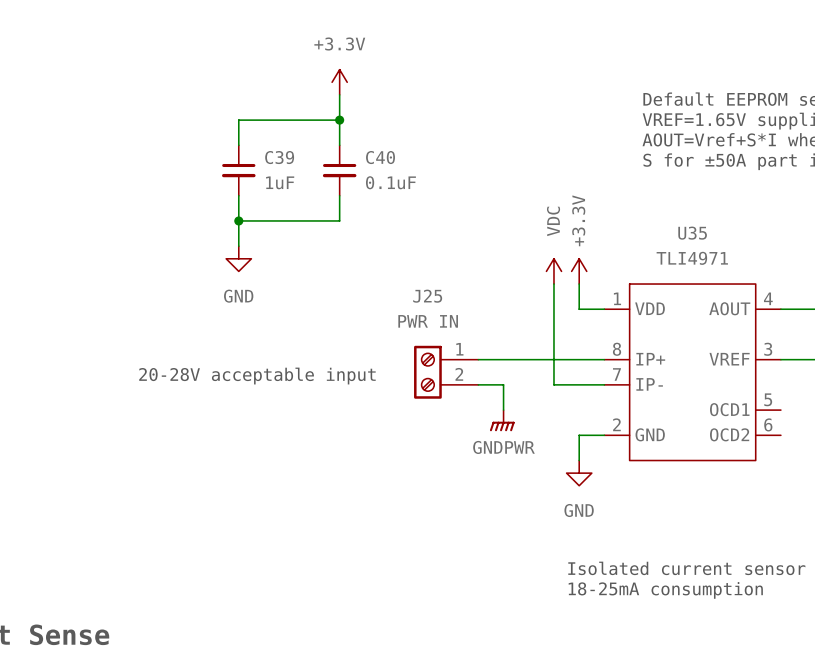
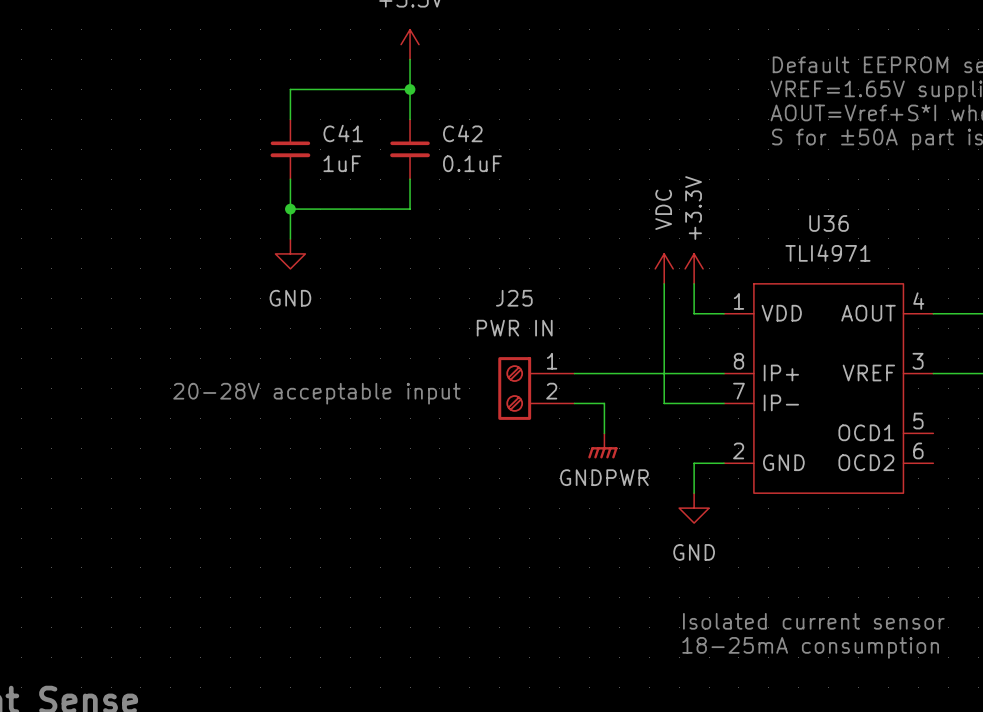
C39 name: C39 (279, 157) -> C41 (343, 133)
C40 name: C40 (380, 157) -> C42 (462, 133)
U35 name: U35 (692, 233) -> U36 (829, 223)

